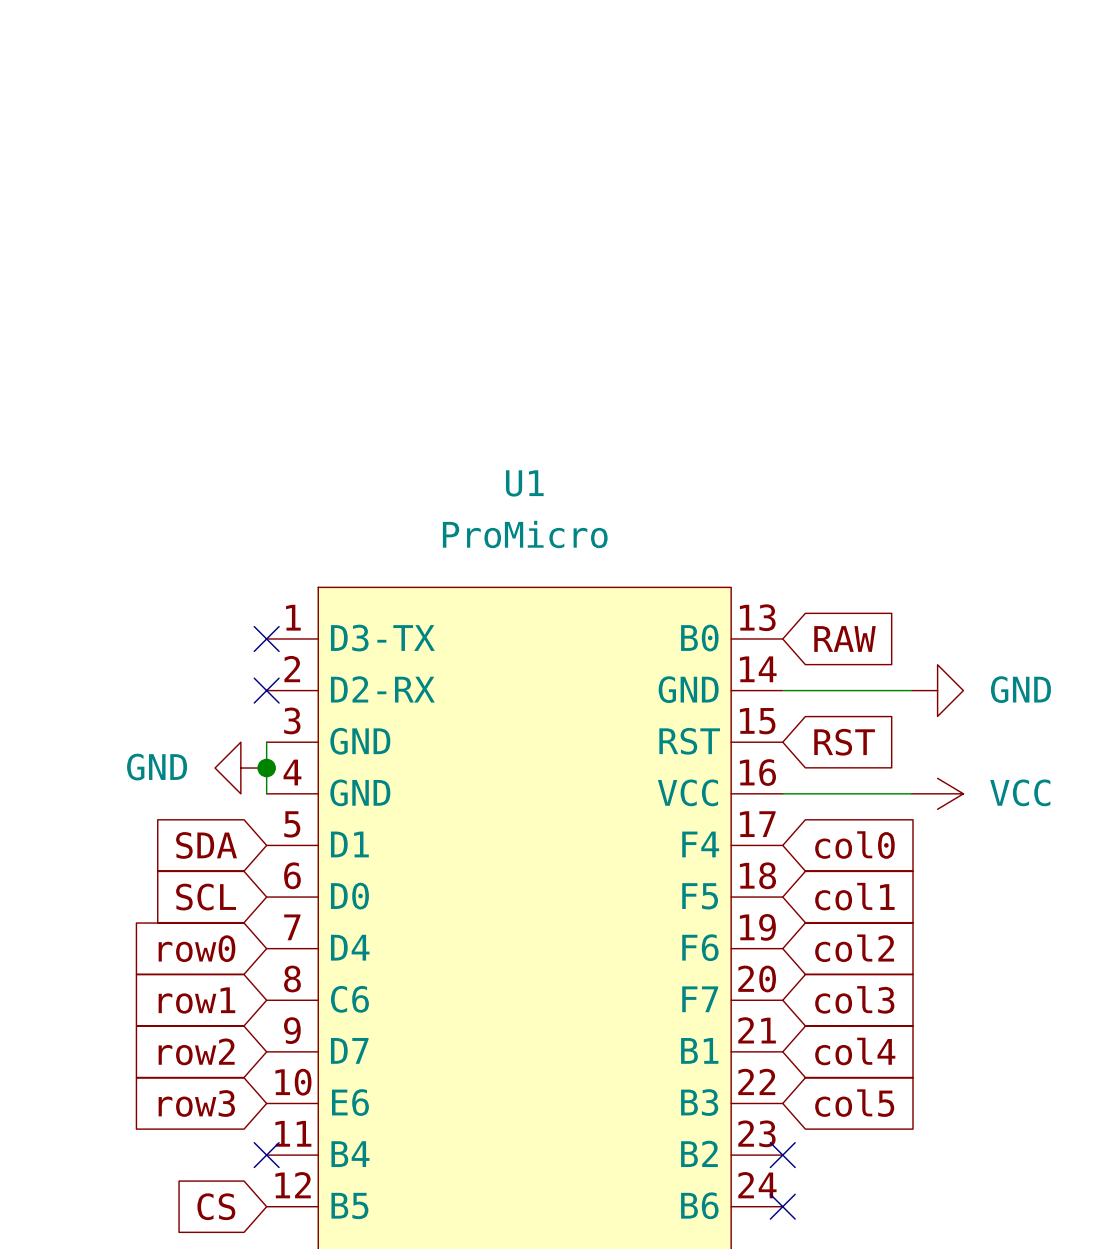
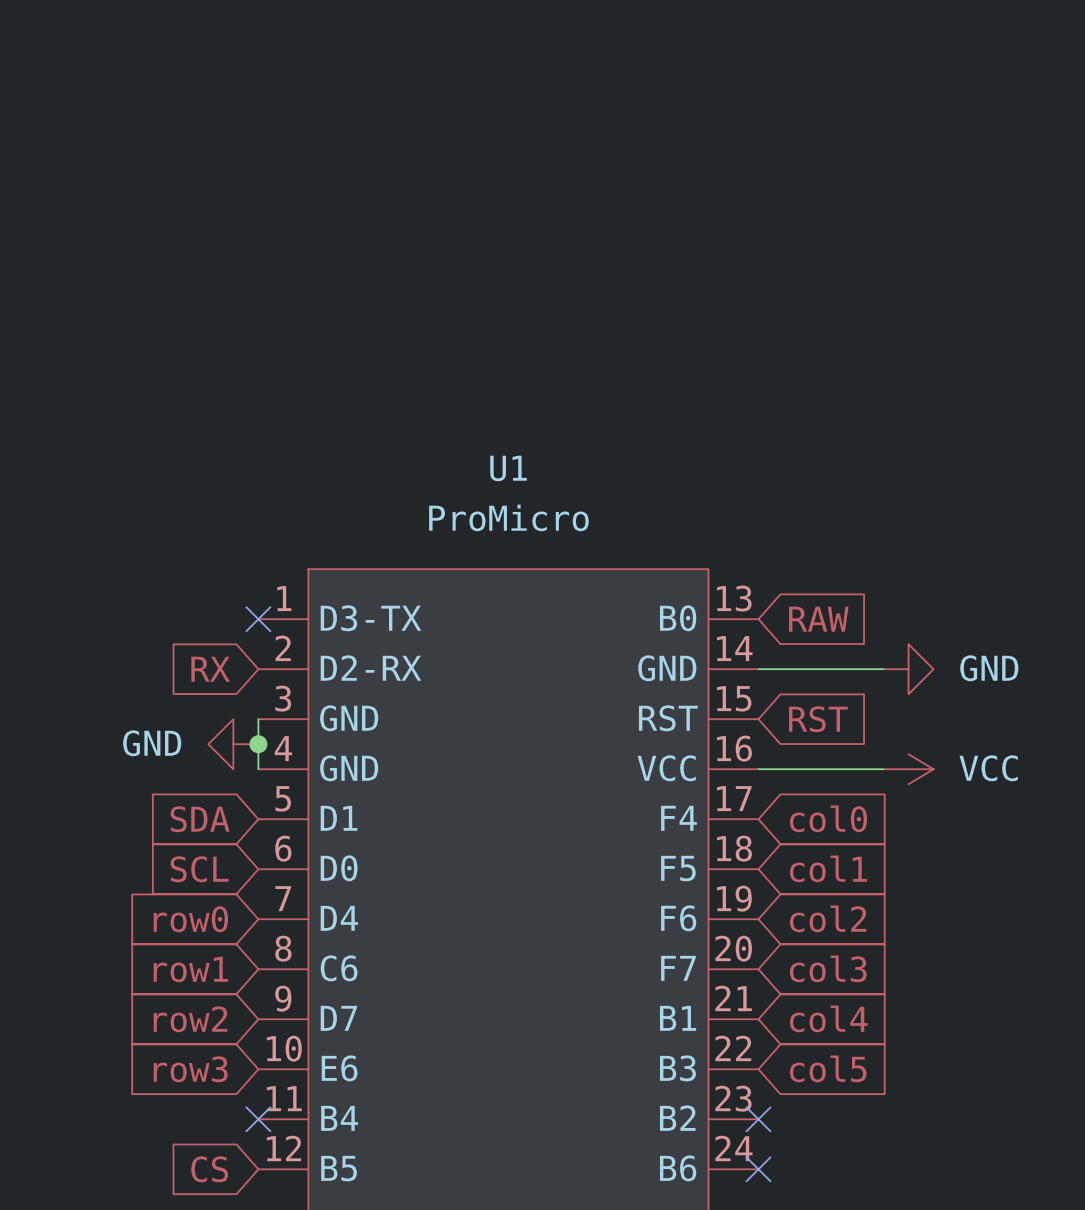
global label: none -> RX (210, 669)
no-connect mark: (266, 690) -> none

